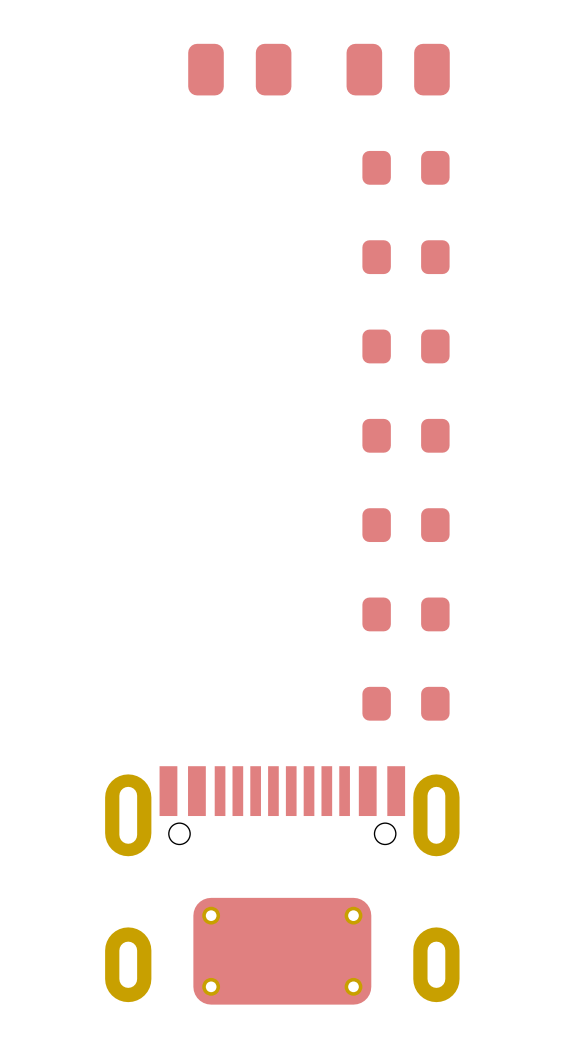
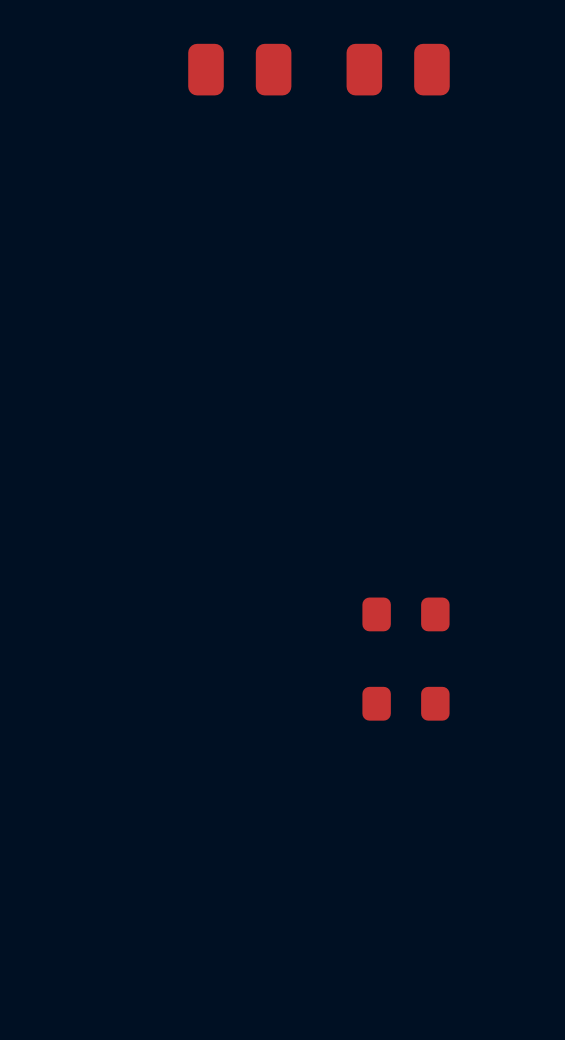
part: (405, 167) -> none
part: (405, 257) -> none
part: (405, 346) -> none
part: (405, 435) -> none
part: (405, 525) -> none
part: (282, 885) -> none

